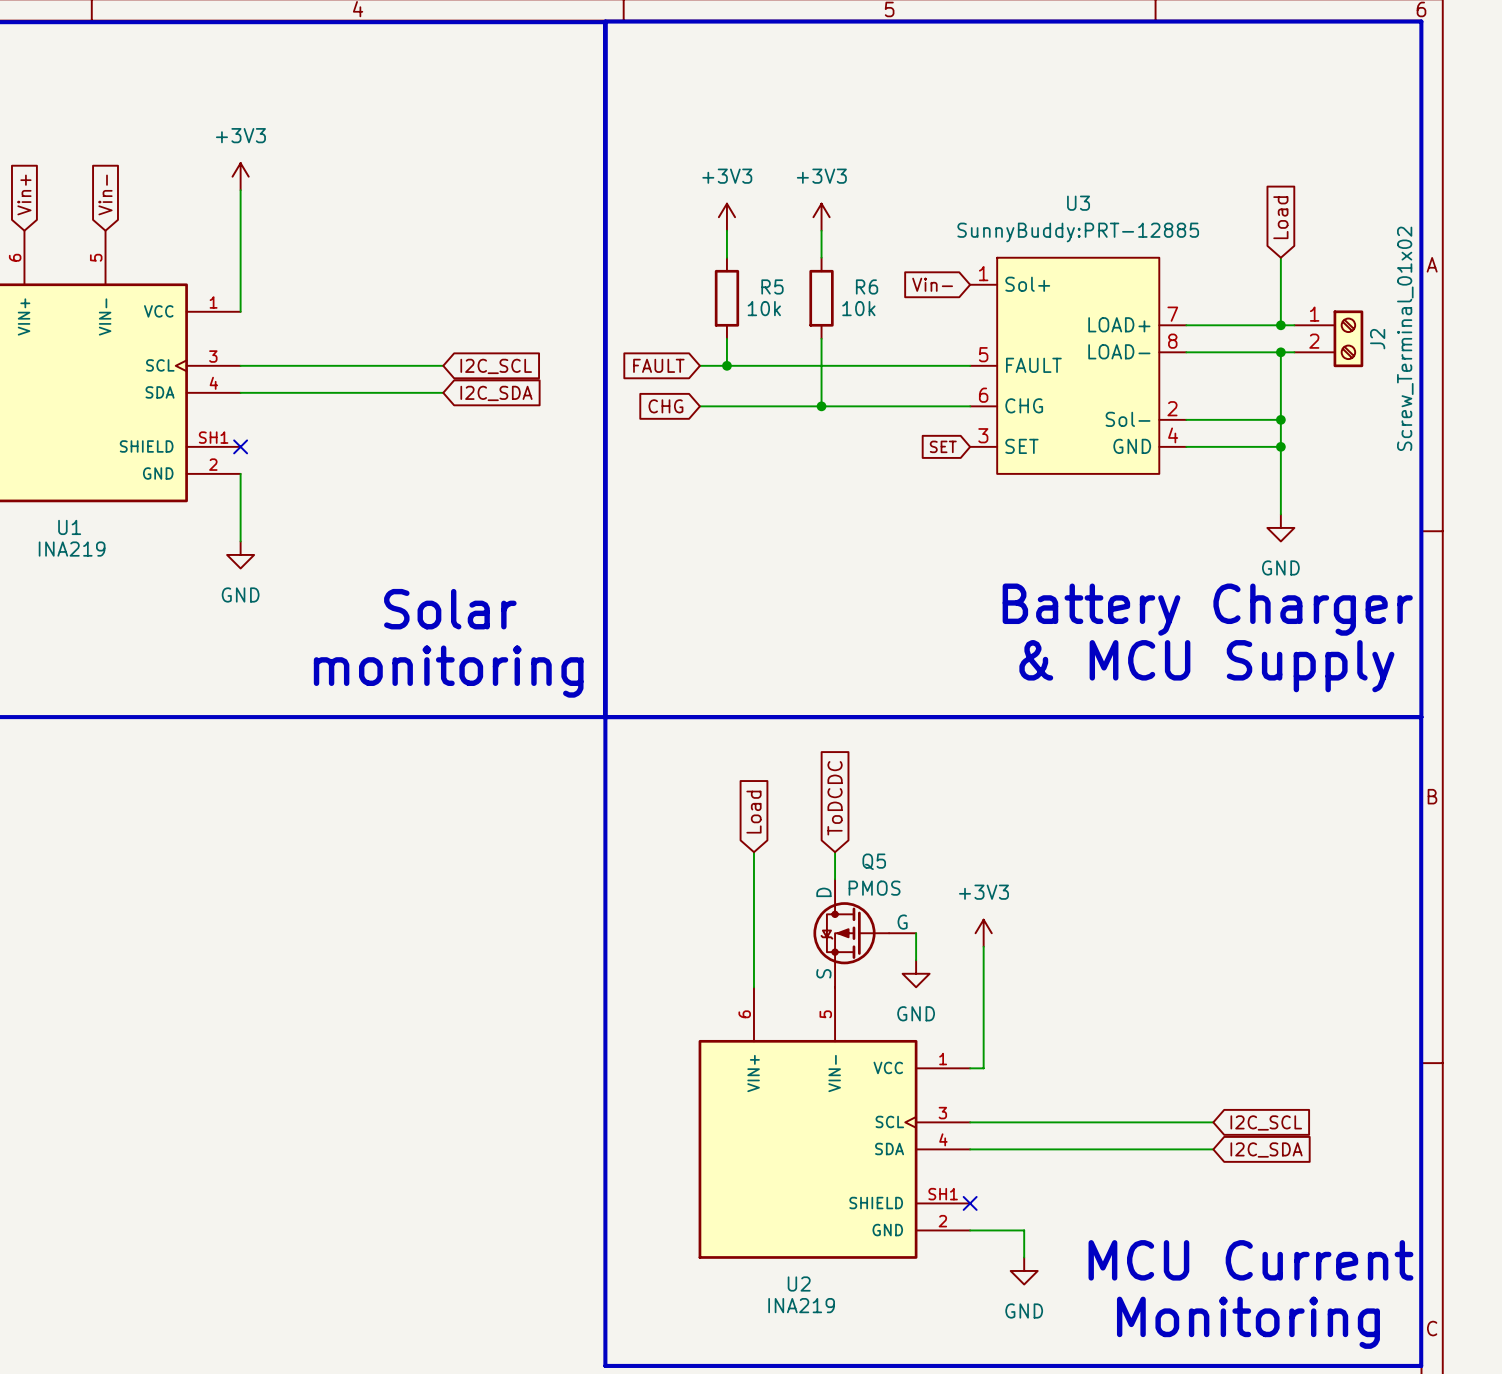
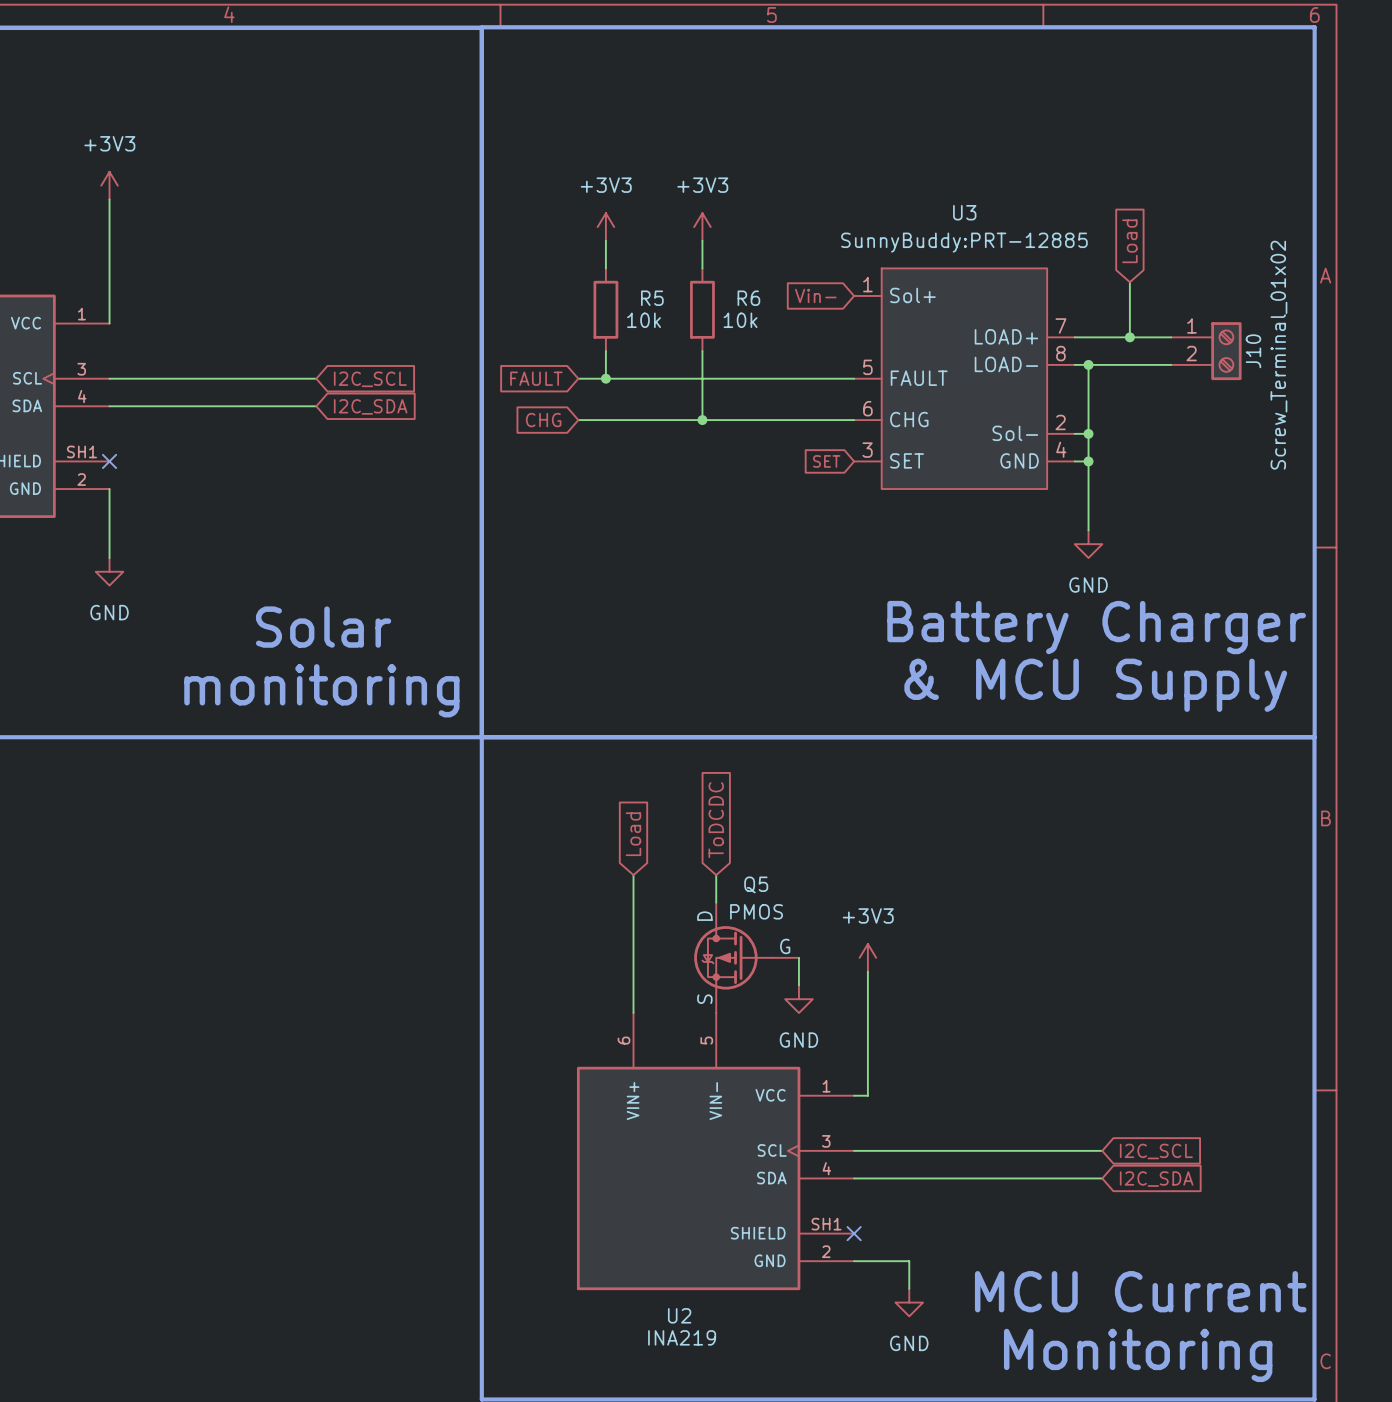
global label position: Load (1280, 217) -> Load (1129, 241)
wire: (1280, 257) (1280, 325) (1294, 325) -> none
wire: none -> (1129, 282) (1129, 337)
junction: none -> (1129, 337)
junction: (1280, 325) -> none
J10: none -> Screw_Terminal_01x02 (1206, 351)
J2: Screw_Terminal_01x02 (1328, 338) -> none
wire: none -> (1088, 364) (1088, 530)
junction: none -> (1088, 364)
junction: (1280, 352) -> none
wire: (1294, 352) (1280, 352) (1280, 514) -> none
wire: (1199, 419) (1280, 419) -> none
junction: none -> (1088, 433)
junction: (1280, 419) -> none
wire: (1199, 446) (1280, 446) -> none
junction: none -> (1088, 461)
junction: (1280, 446) -> none
power symbol position: GND (1280, 527) -> GND (1088, 544)

